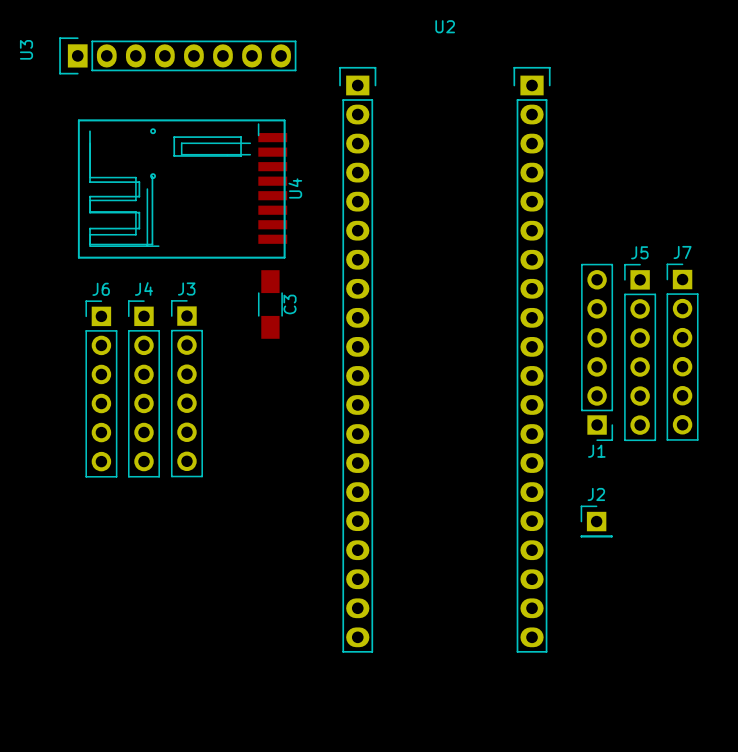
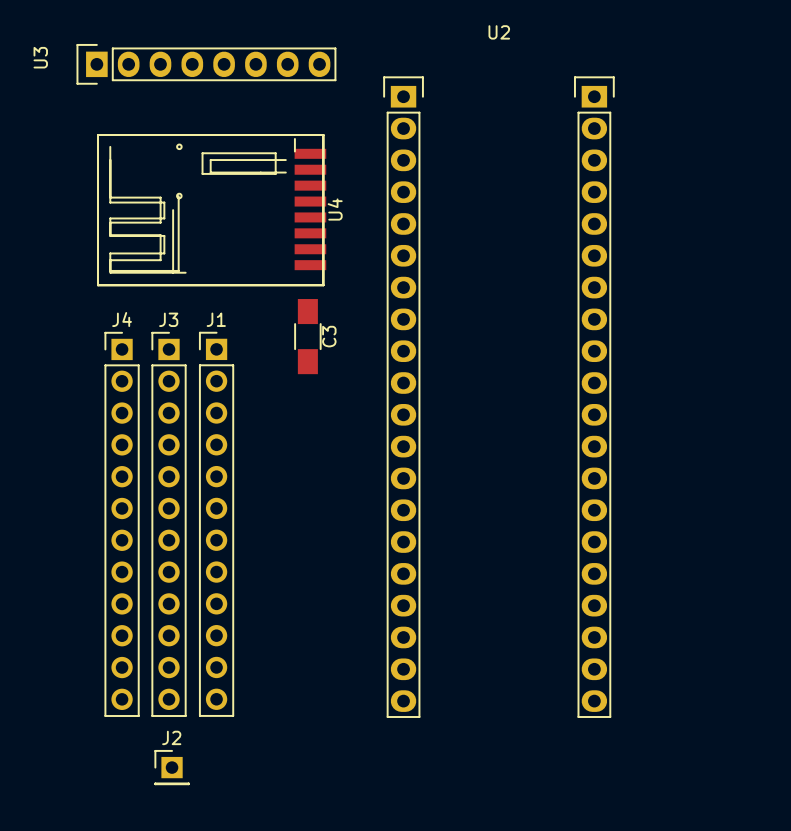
J1 footprint: [581, 263, 613, 441] -> [199, 331, 234, 717]
J4 name position: J4 (144, 288) -> J4 (122, 319)
J3 name position: J3 (186, 289) -> J3 (168, 319)
J4 footprint: [128, 300, 160, 478] -> [104, 332, 140, 717]
J3 footprint: [171, 300, 203, 478] -> [151, 332, 187, 717]
J5: (640, 352) -> none
J7: (682, 352) -> none
J6: (101, 388) -> none
J1 name position: J1 (596, 451) -> J1 (216, 319)
J2 position: (596, 521) -> (172, 767)

